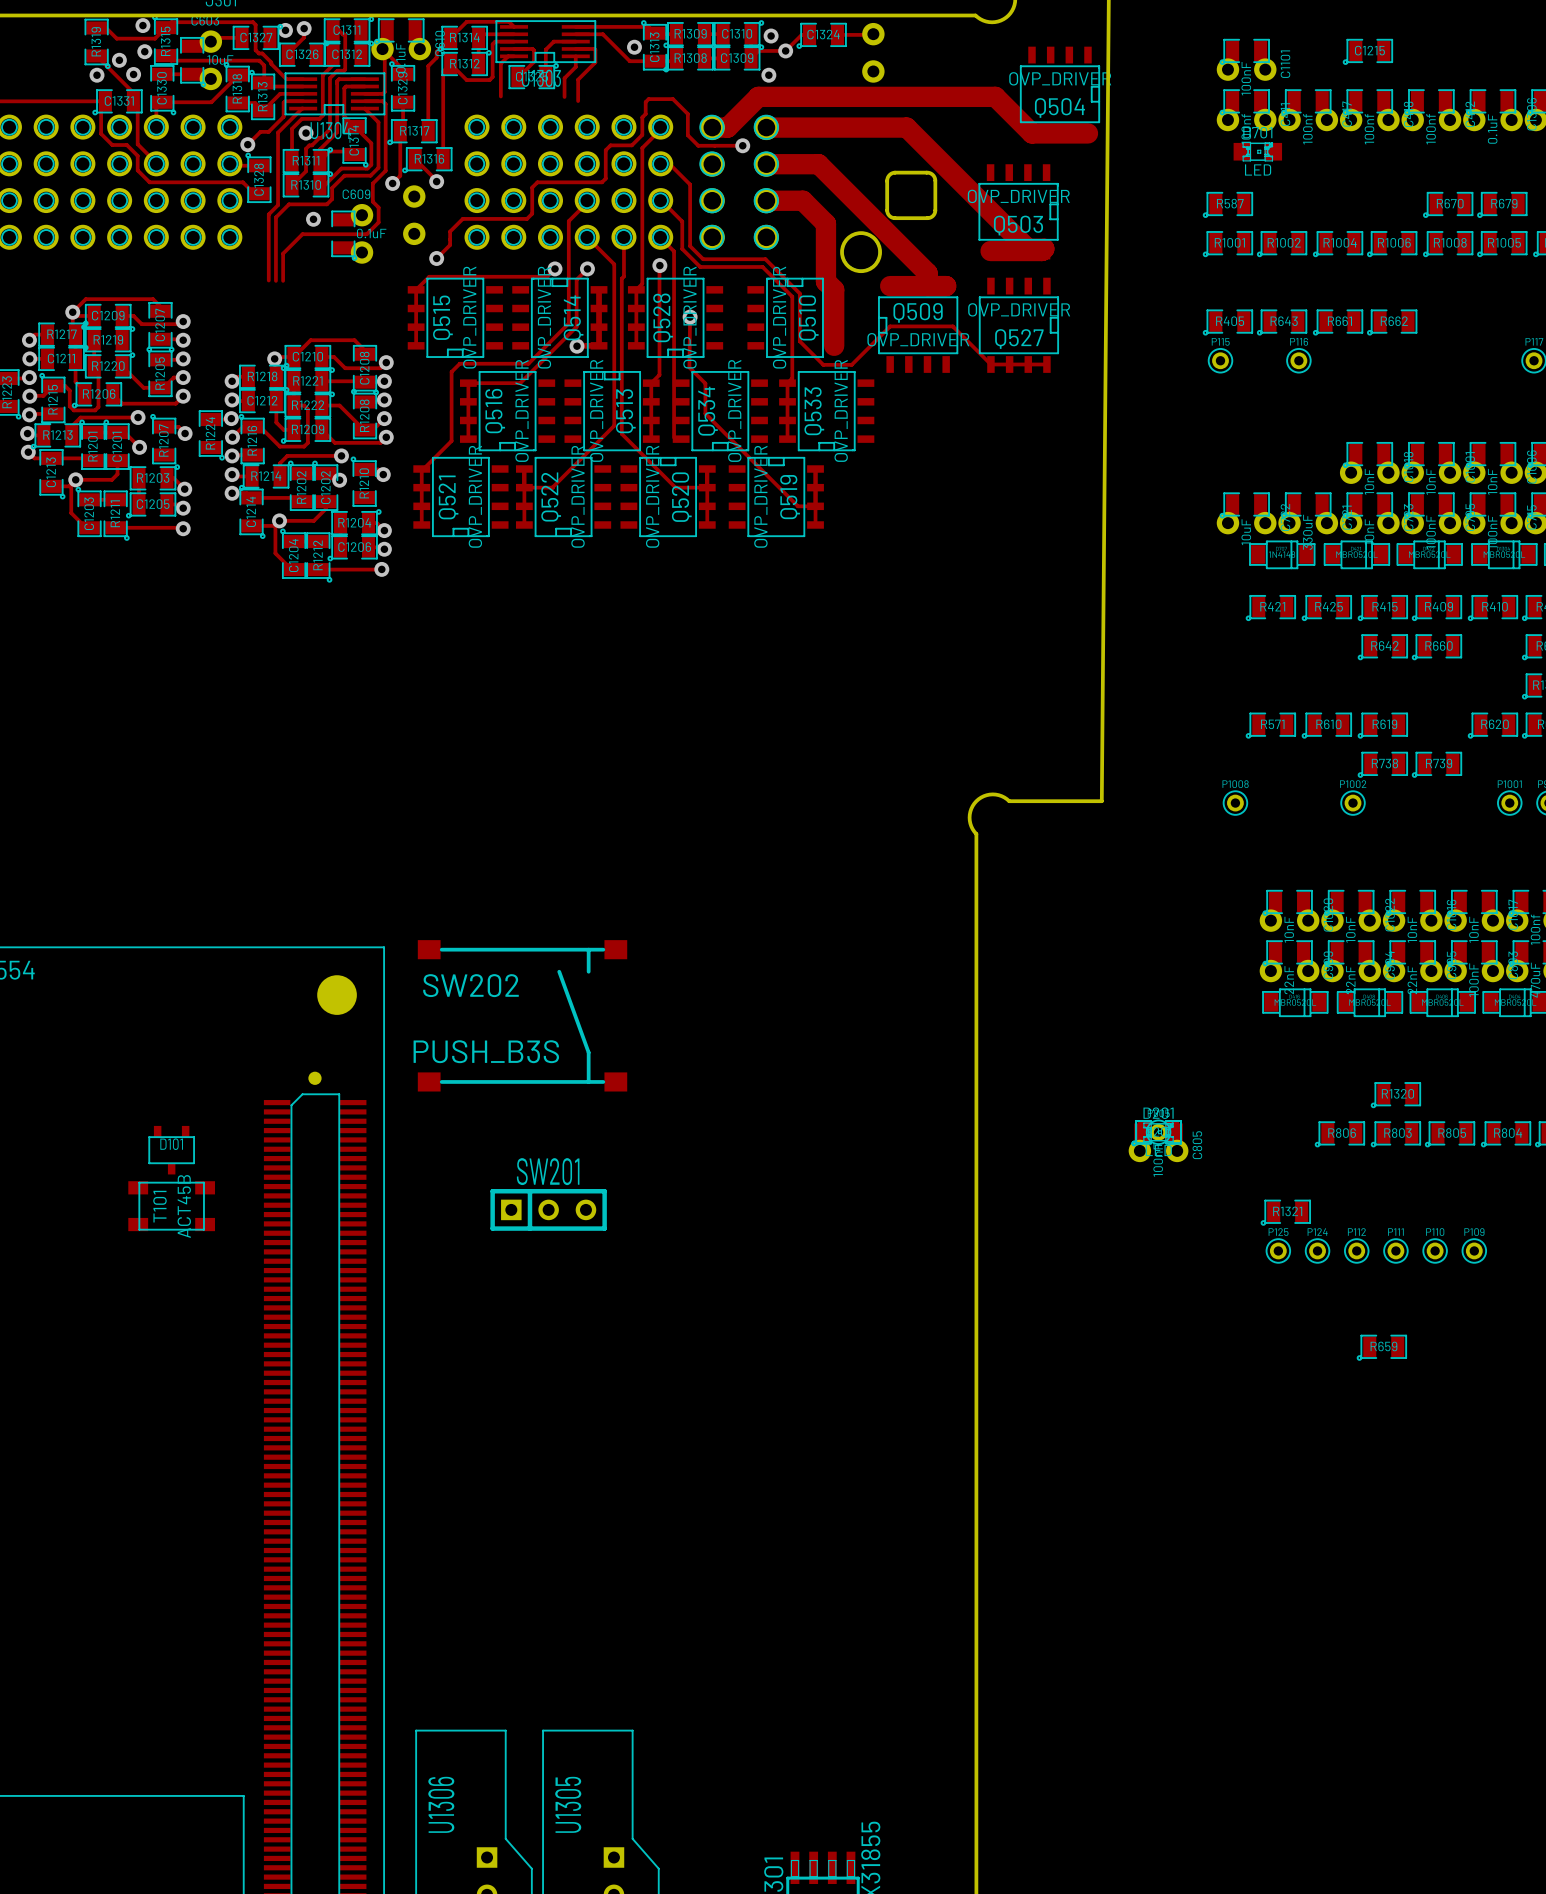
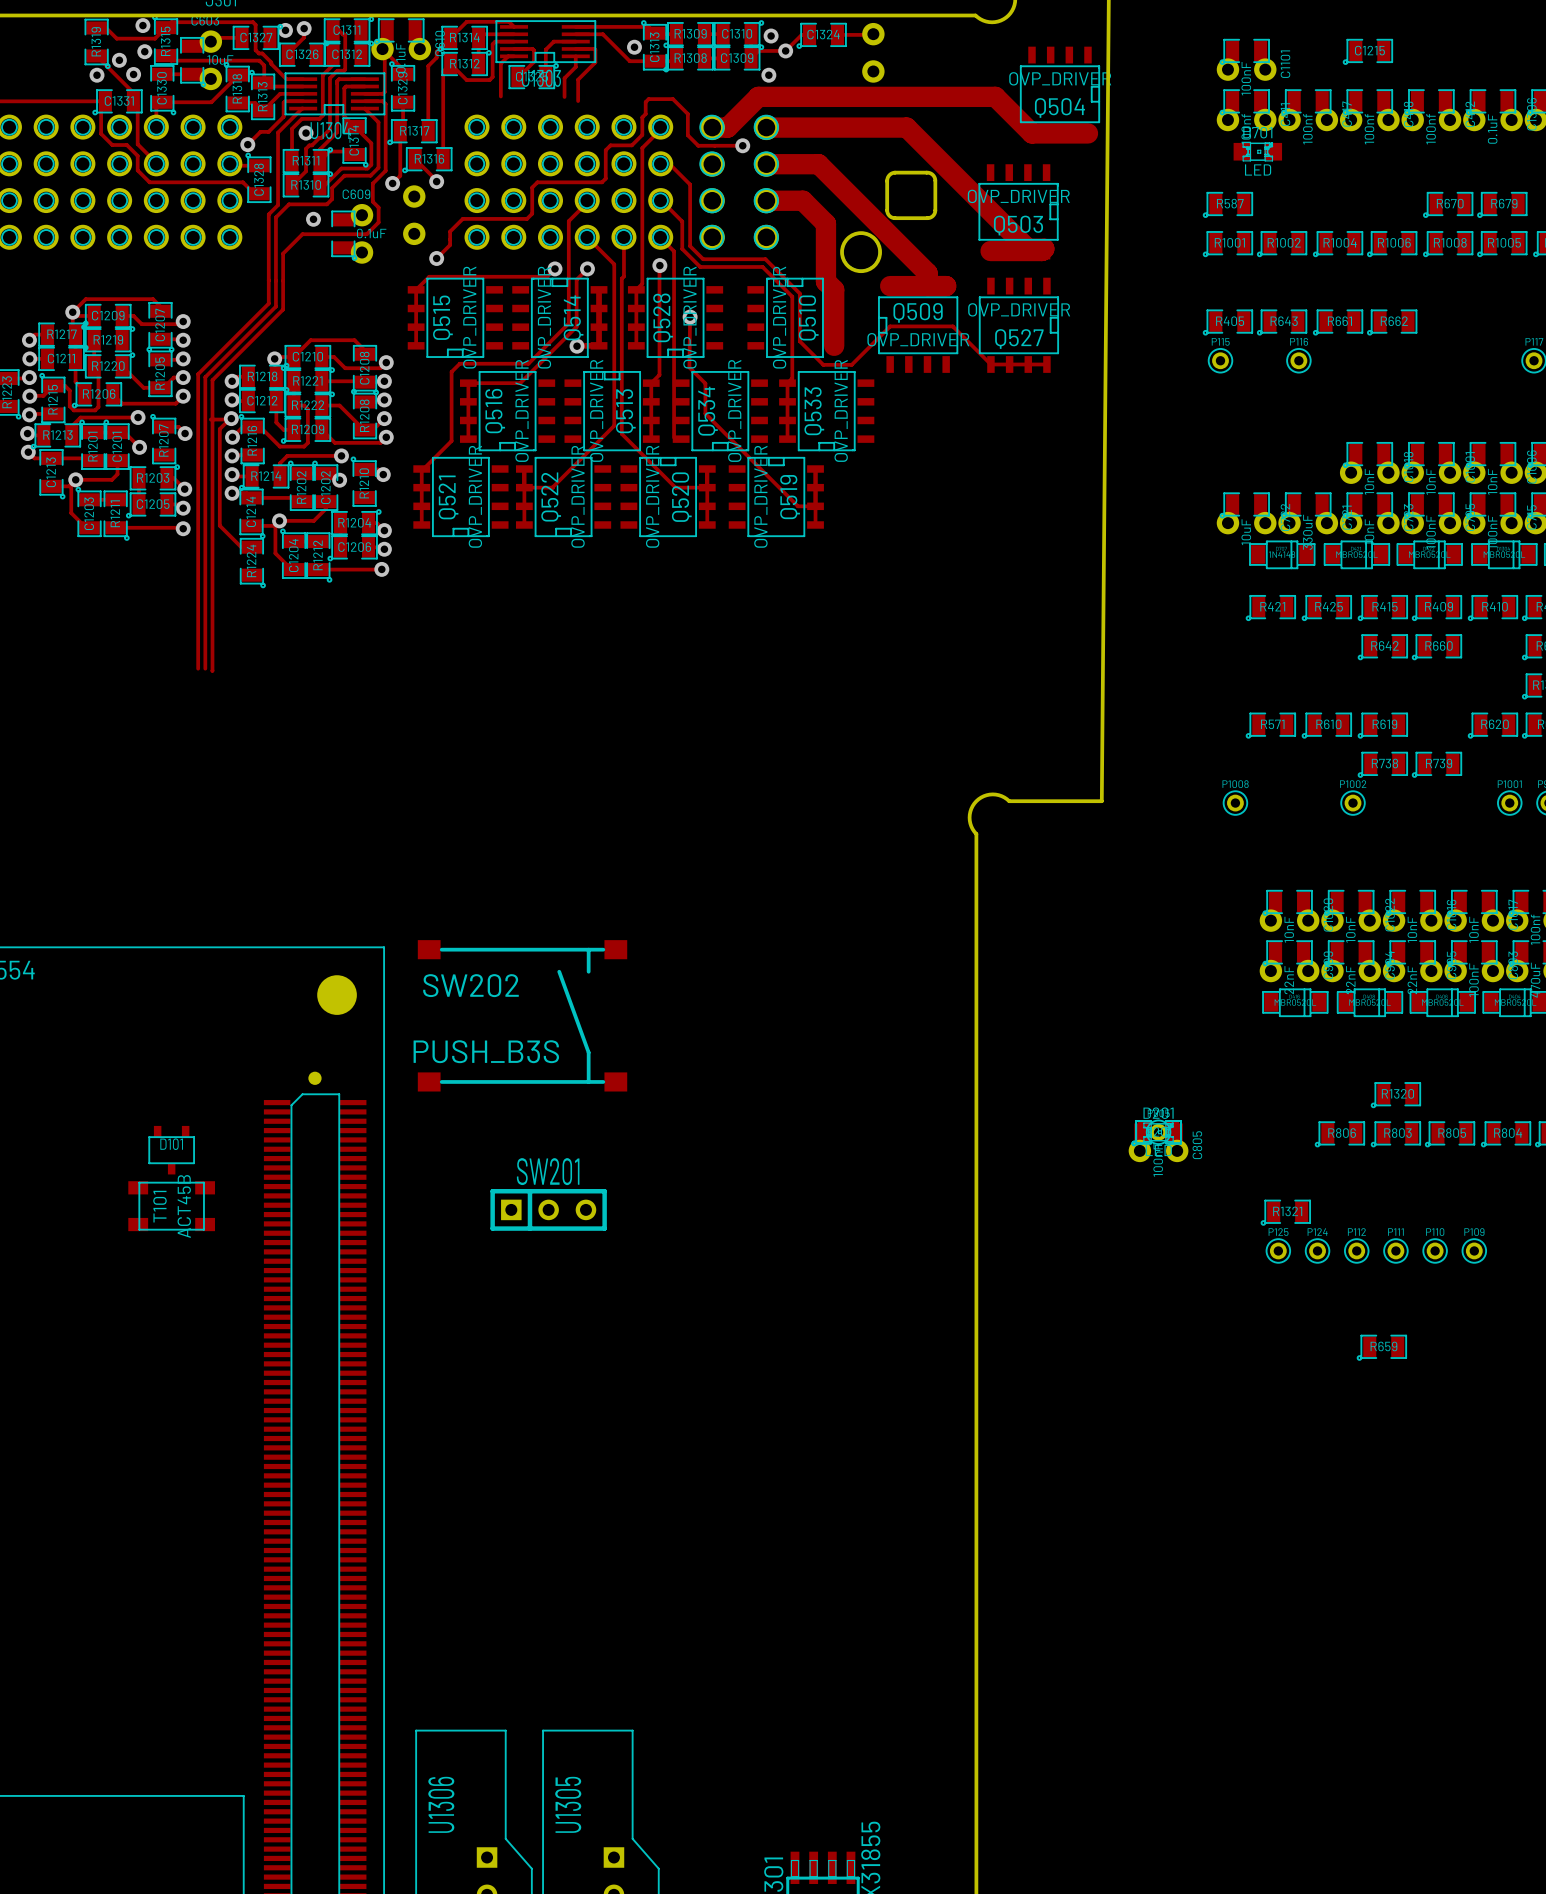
track: none -> (268, 280) (268, 303) (198, 374) (198, 668)
track: none -> (275, 280) (275, 306) (205, 377) (205, 668)
track: none -> (283, 280) (283, 309) (212, 380) (212, 670)
track: none -> (232, 418) (229, 418) (219, 429) (219, 525) (241, 547) (251, 547)
R1224 position: (211, 435) -> (252, 563)

